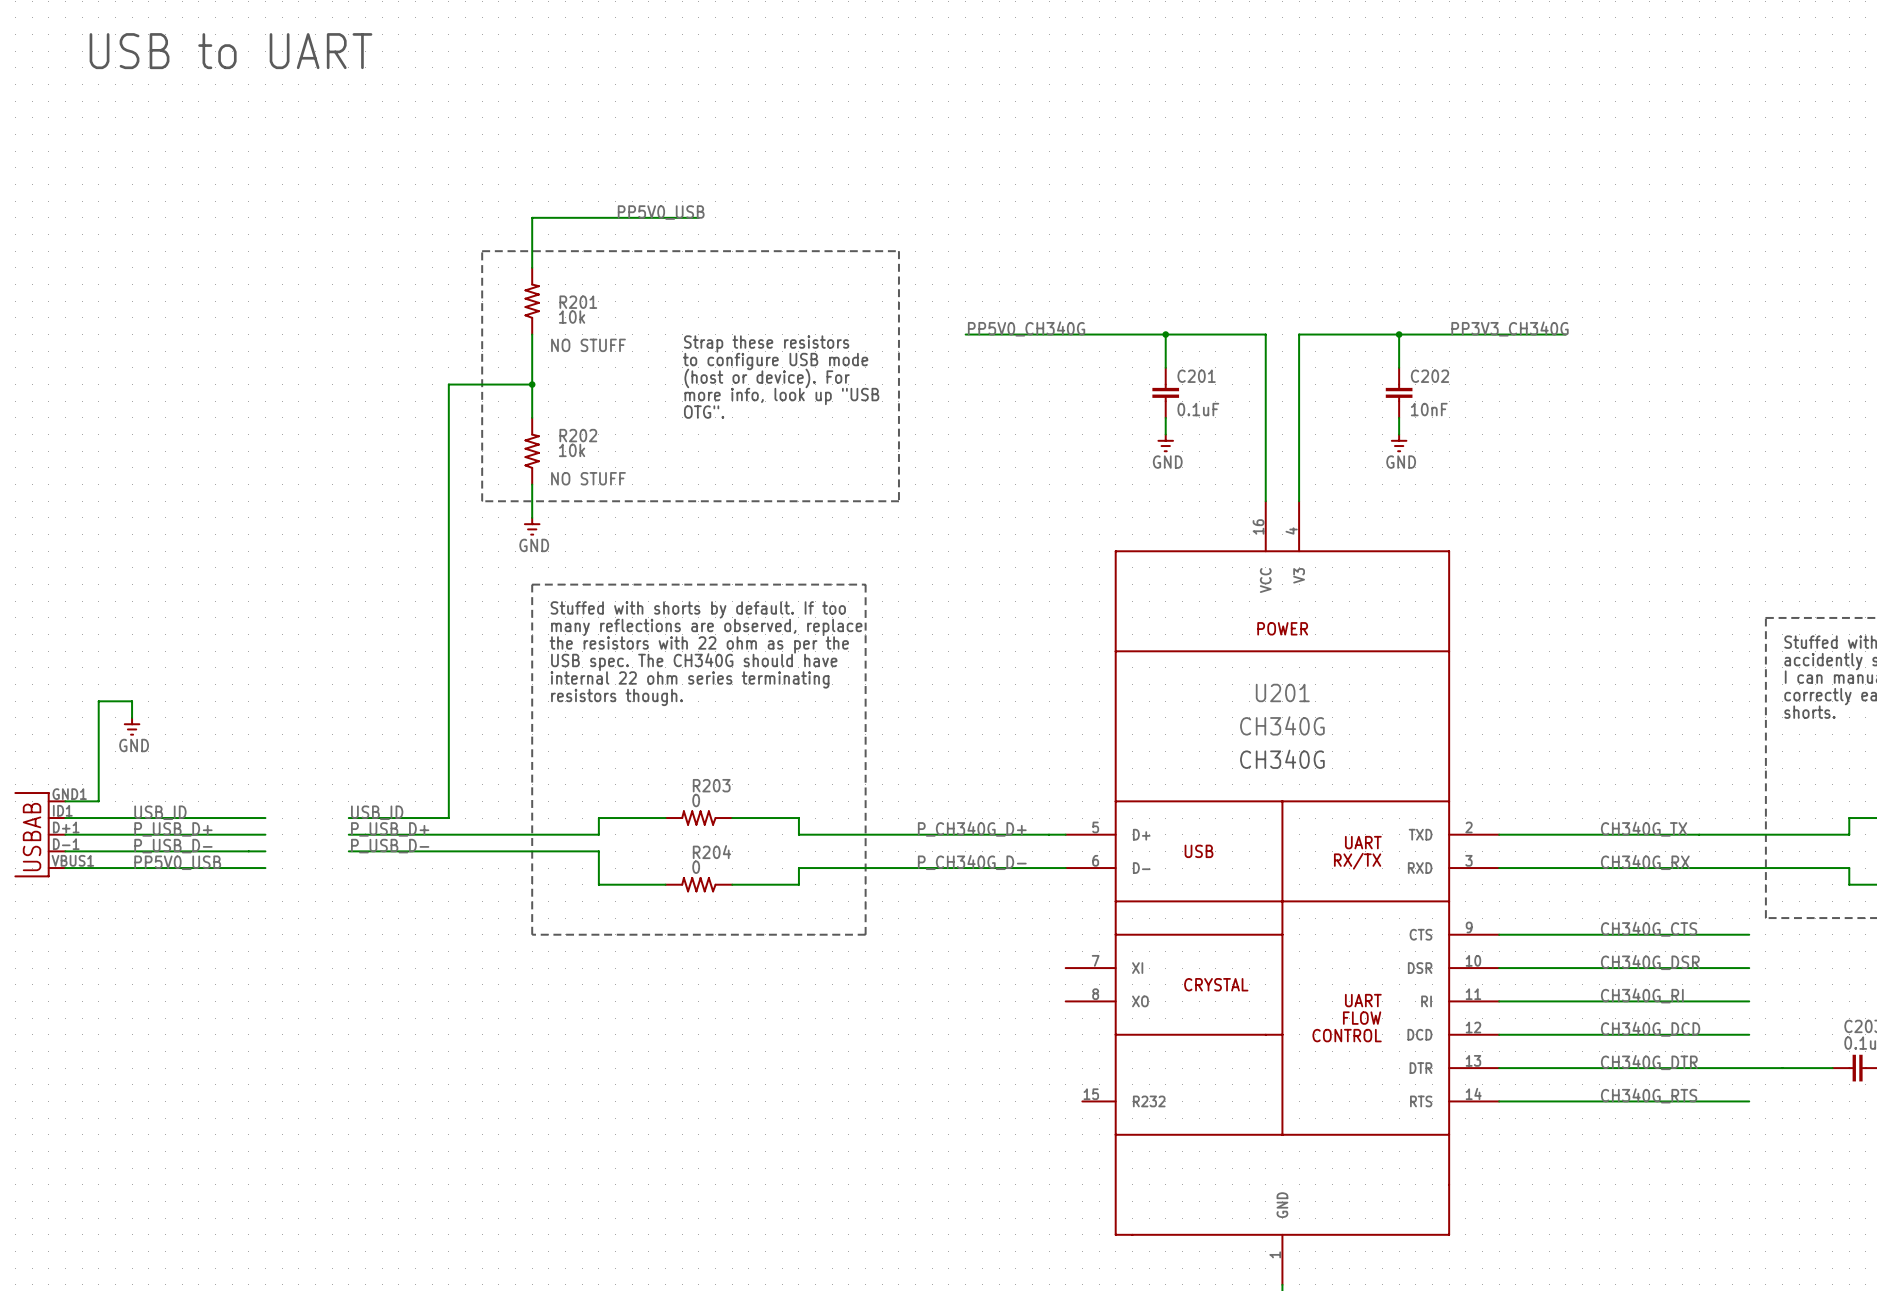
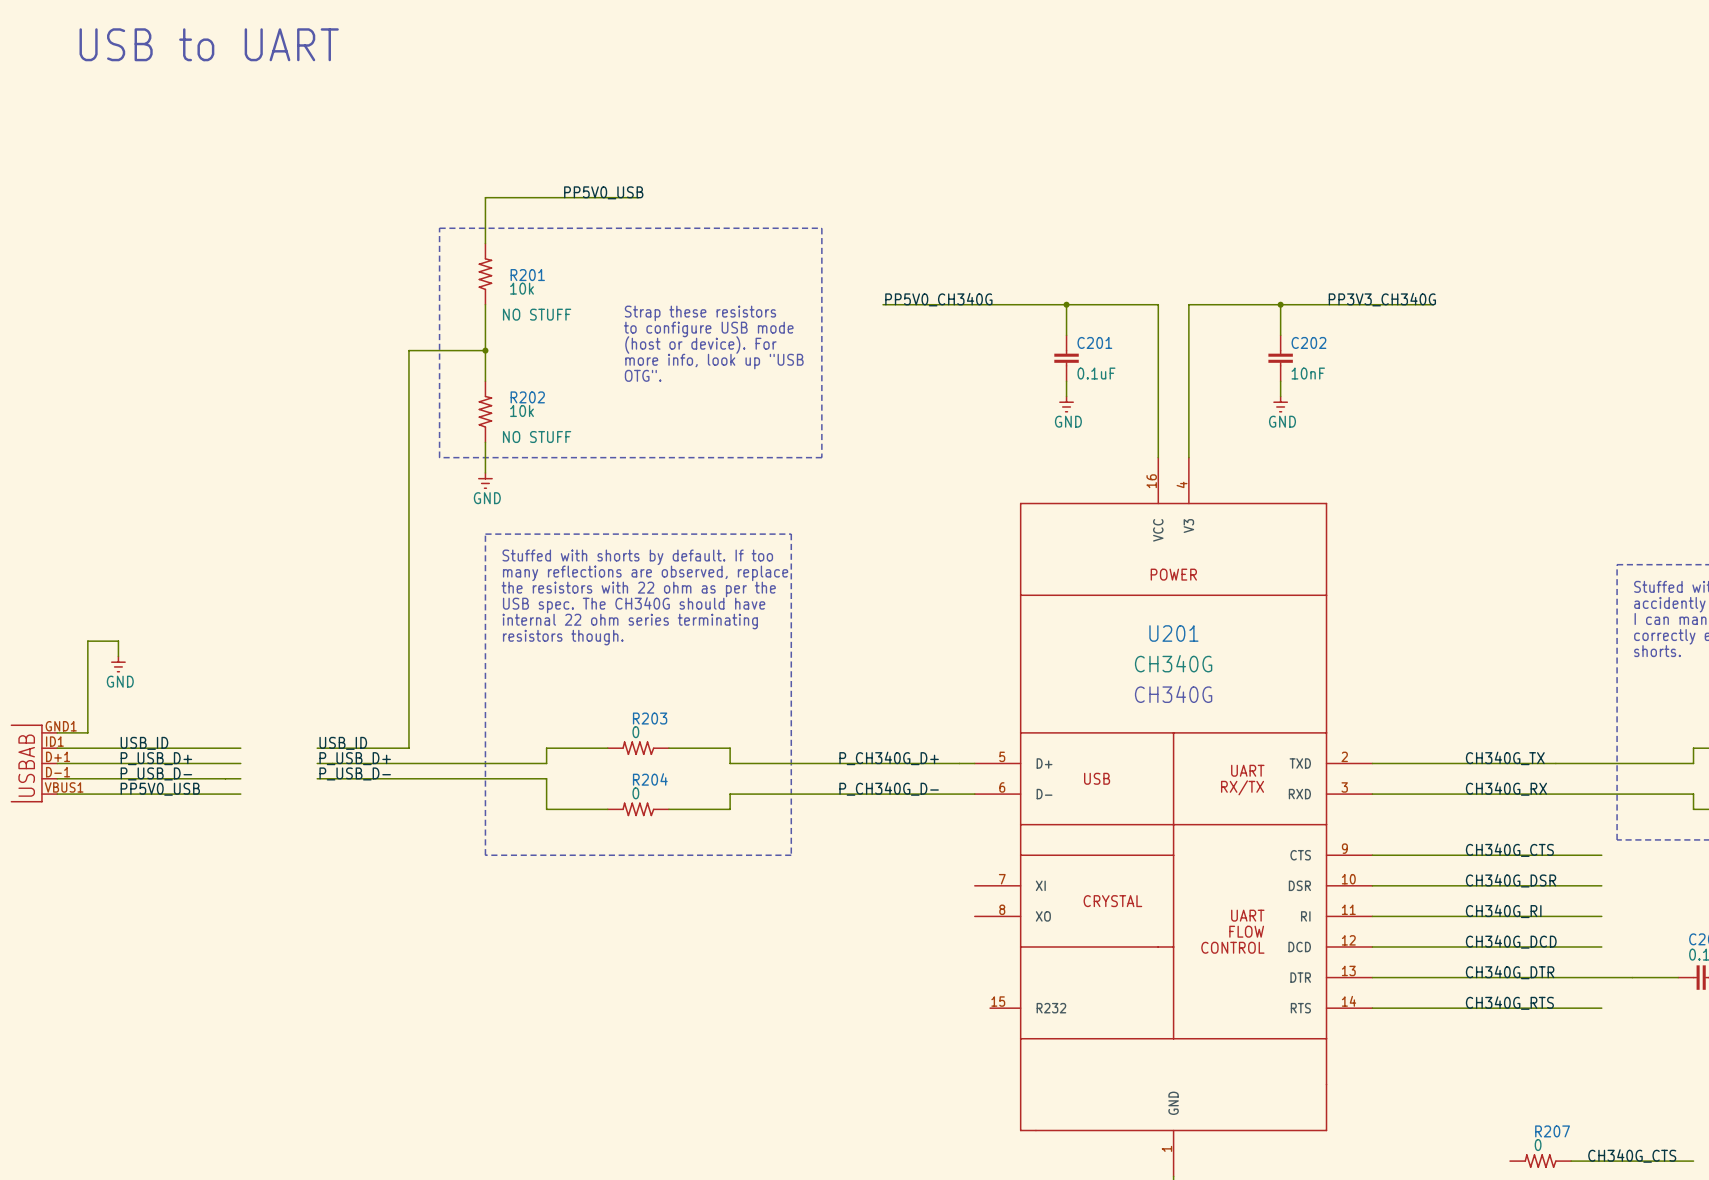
label: none -> CH340G_CTS (1632, 1155)
R207: none -> 0 (1540, 1161)
wire: none -> (1571, 1161) (1693, 1161)

